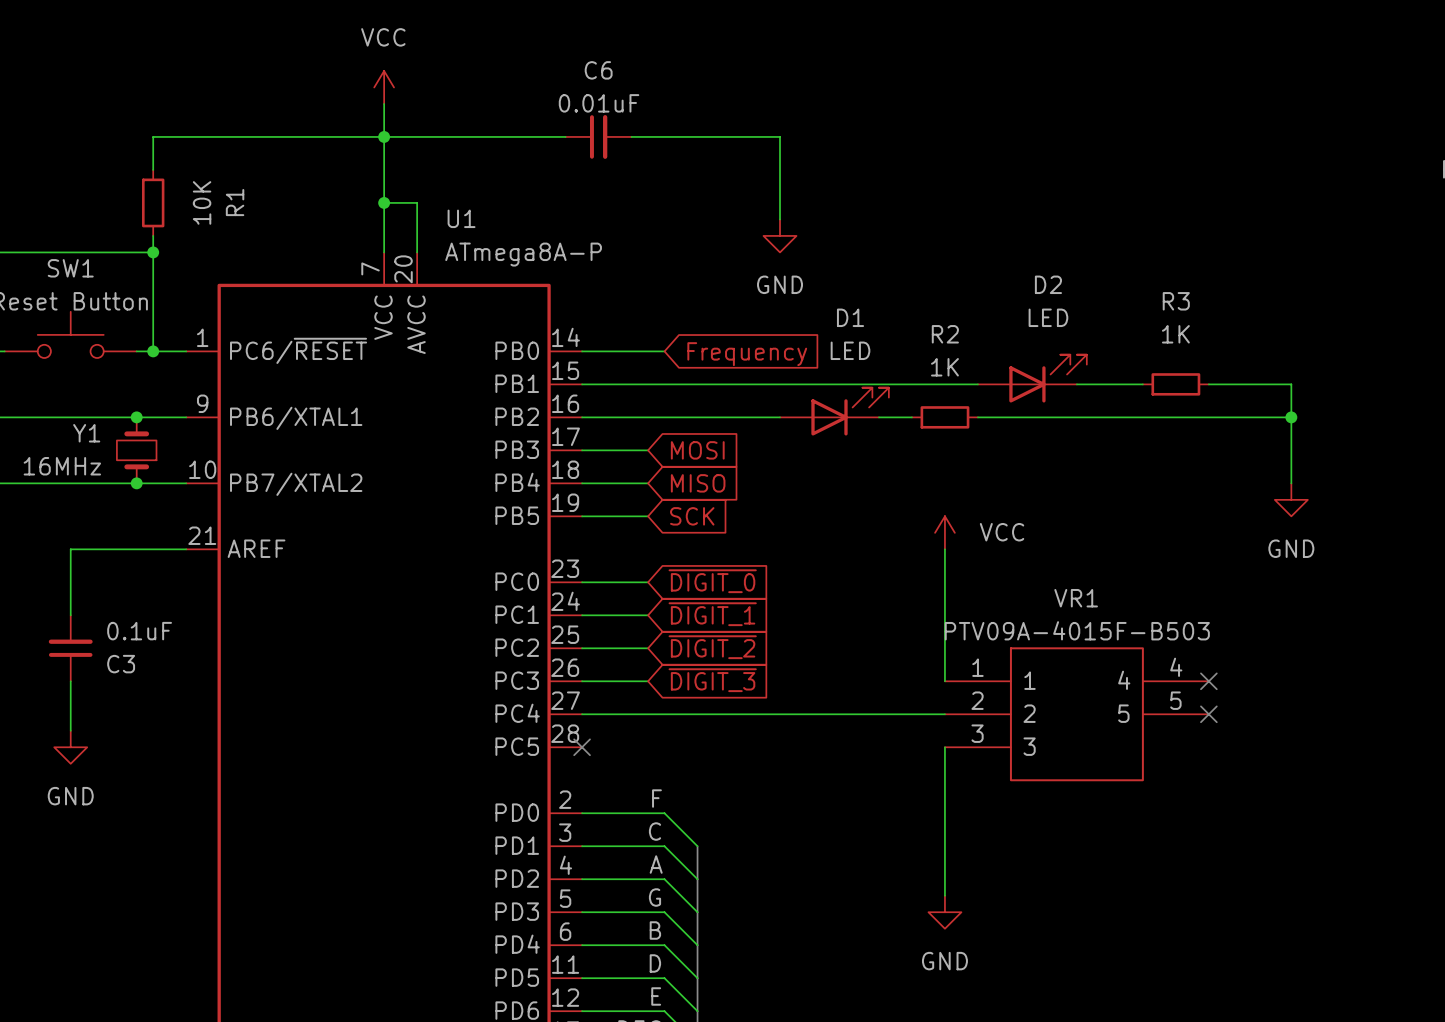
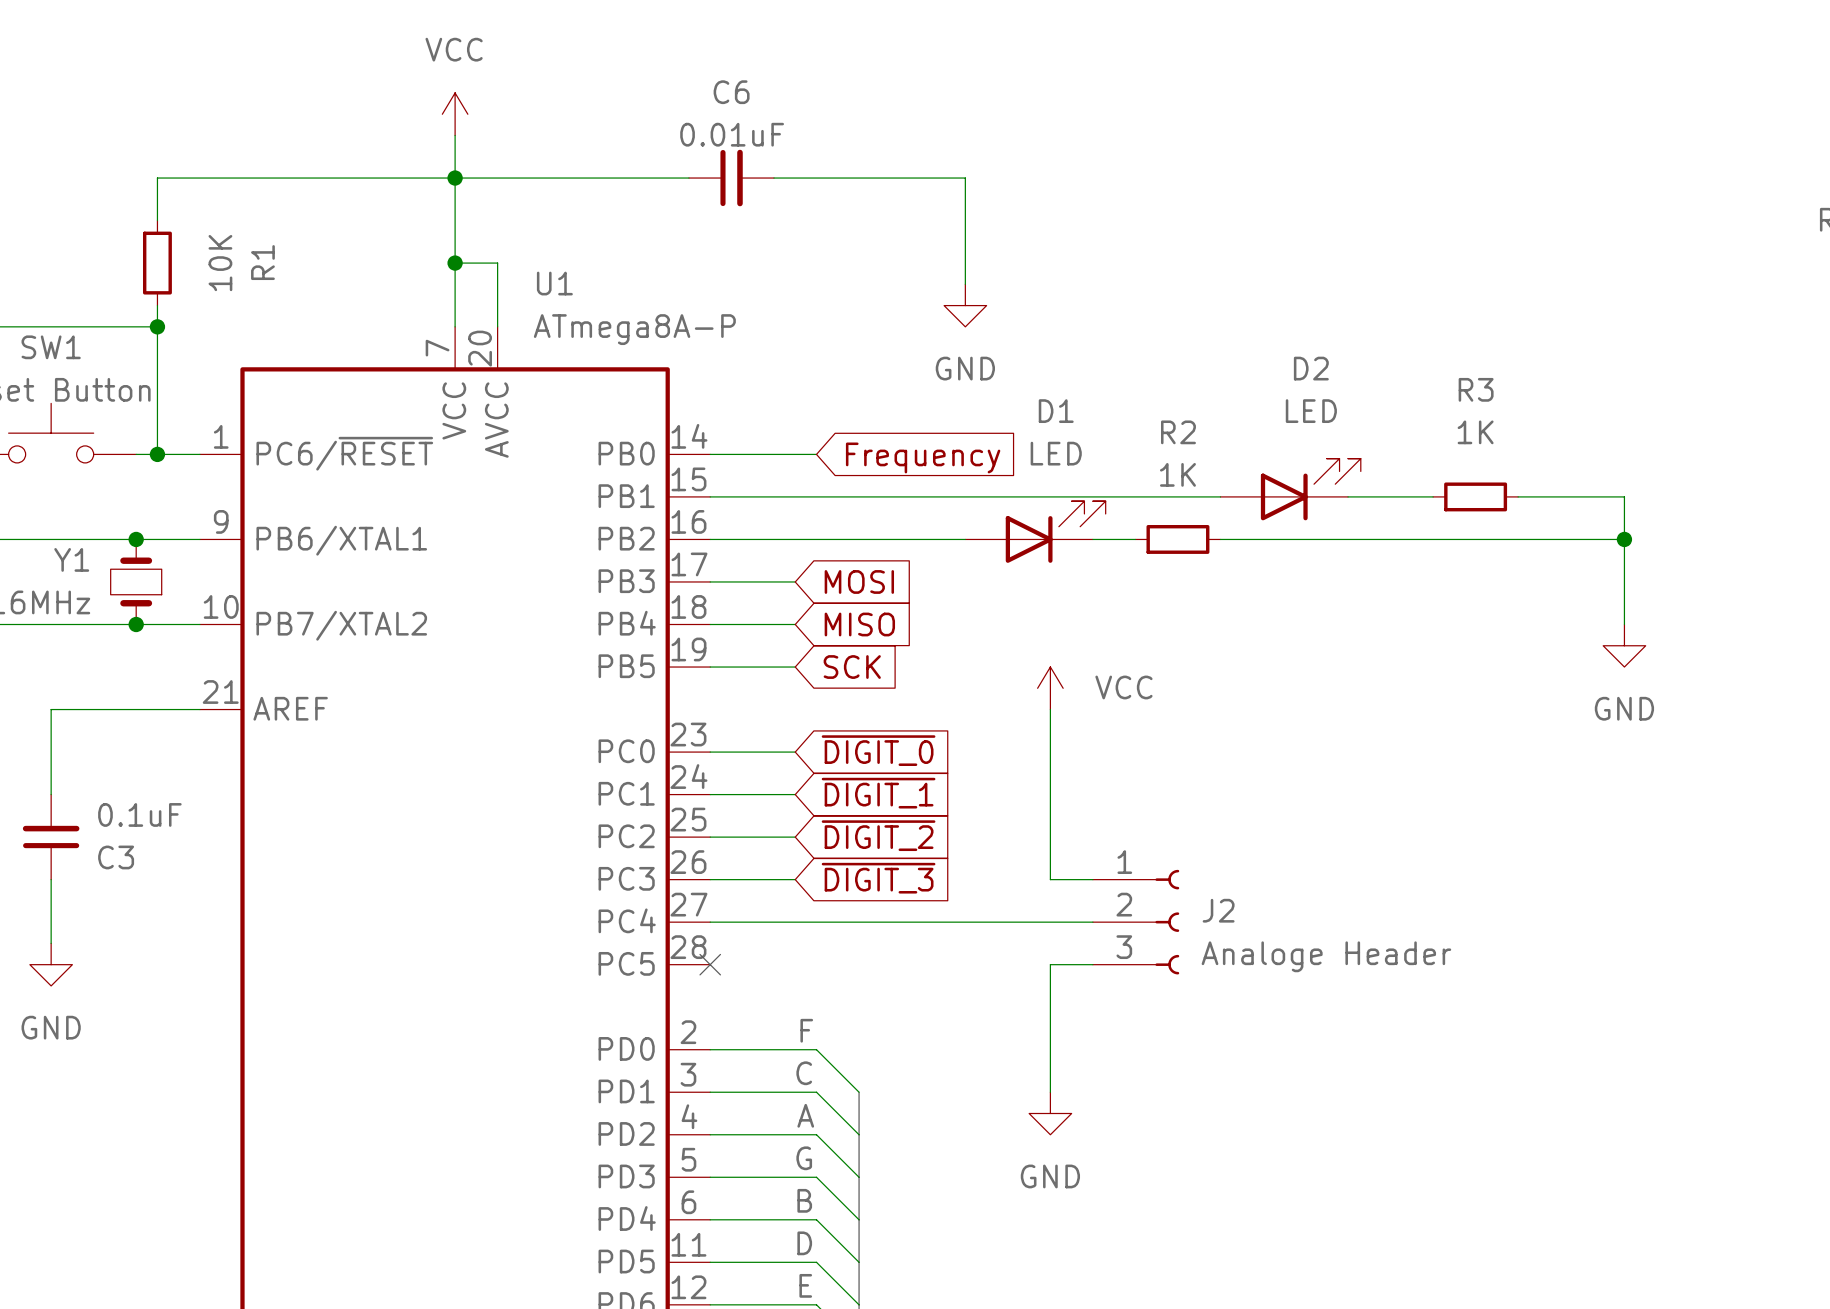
power symbol position: VCC (944, 532) -> VCC (1050, 688)
wire: none -> (1050, 709) (1050, 879) (1092, 879)
wire: (944, 549) (944, 681) -> none
no-connect mark: (1208, 681) -> none
J2: none -> Analoge Header (1136, 922)
VR1: PTV09A-4015F-B503 (1076, 714) -> none
no-connect mark: (1208, 714) -> none
wire: none -> (1092, 964) (1050, 964) (1050, 1092)
wire: (944, 747) (944, 895) -> none
power symbol position: GND (944, 912) -> GND (1050, 1113)

